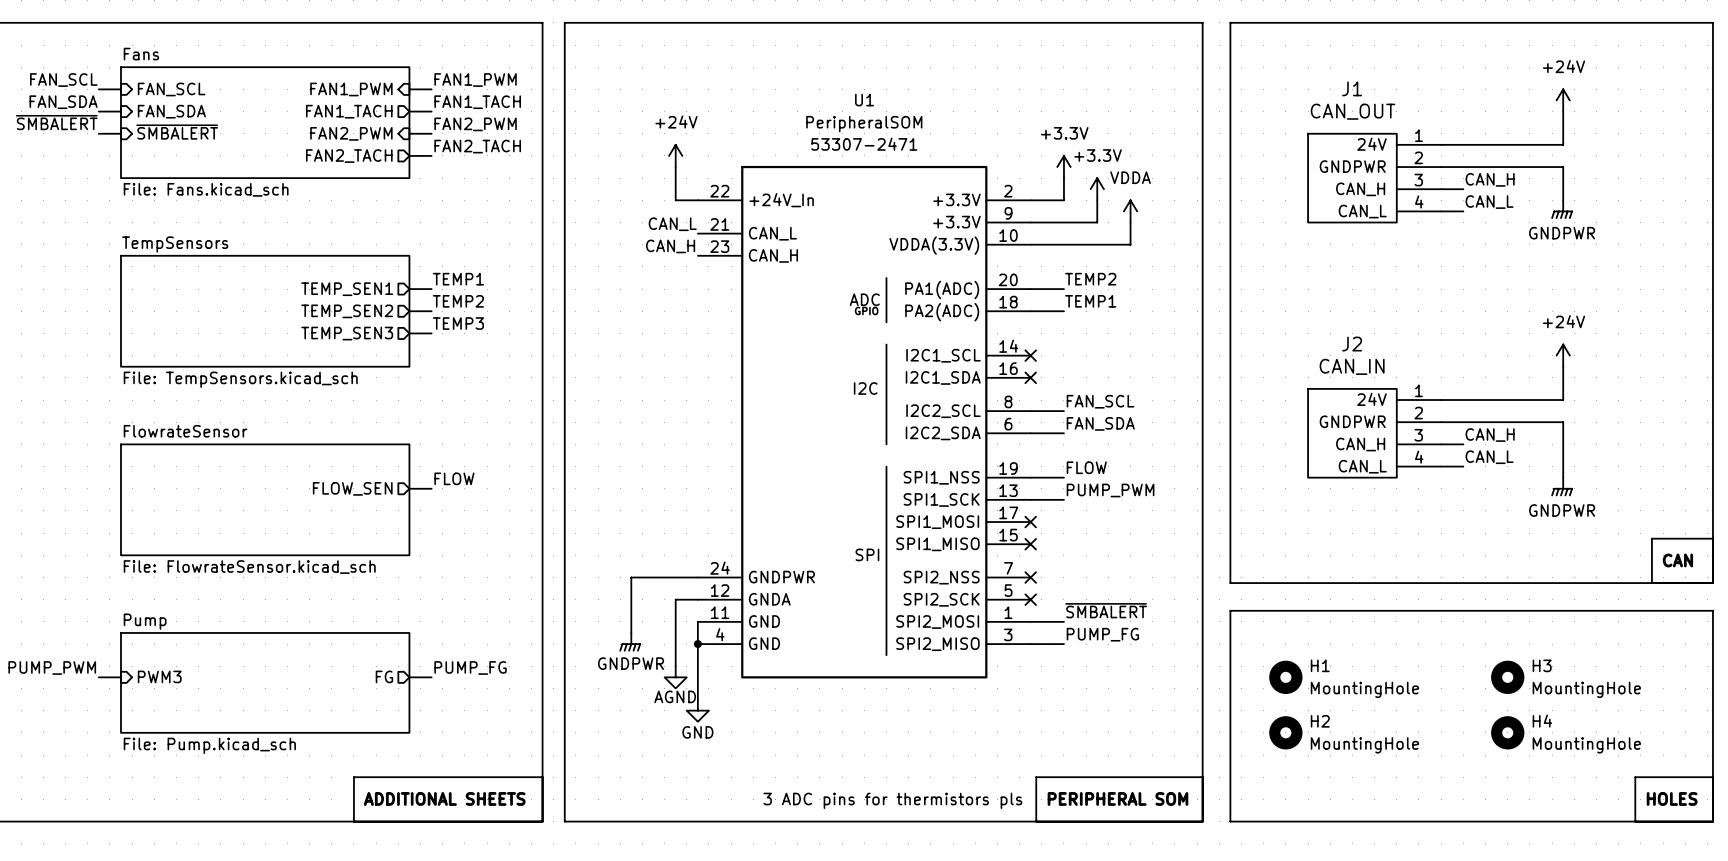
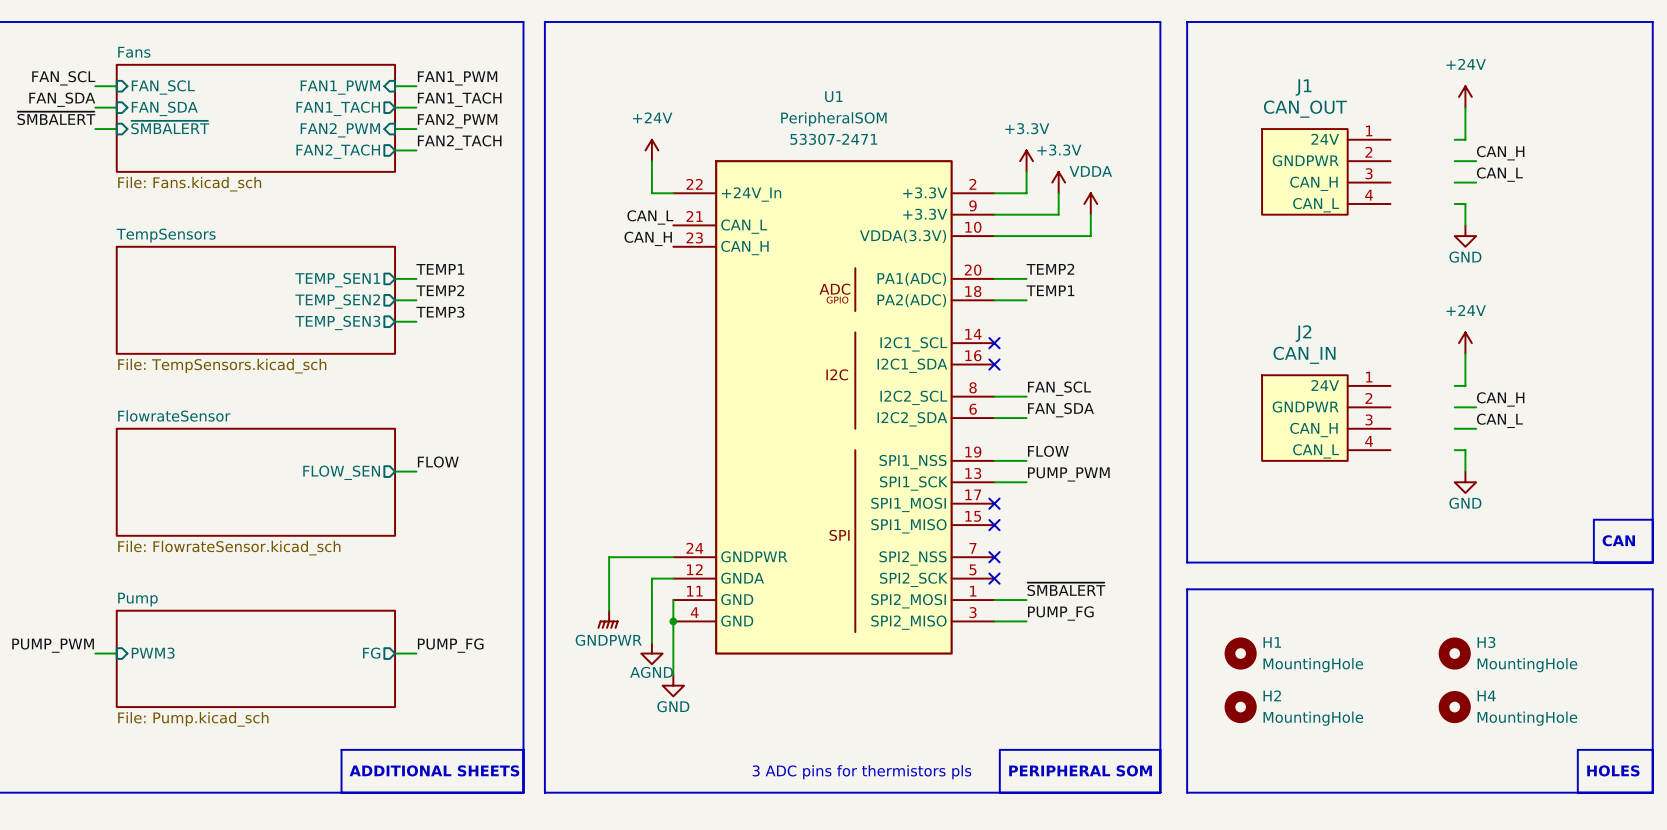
power symbol position: +24V (1563, 100) -> +24V (1465, 96)
wire: (1563, 111) (1563, 144) (1518, 144) -> (1465, 107) (1465, 139)
wire: (1441, 144) (1507, 144) -> none
wire: (1441, 167) (1507, 167) -> none
wire: (1529, 167) (1563, 167) (1563, 200) -> none
label position: CAN_H (1490, 179) -> CAN_H (1500, 153)
wire: (1441, 189) (1463, 189) -> (1454, 182) (1476, 182)
label position: CAN_L (1489, 202) -> CAN_L (1499, 174)
power symbol: GNDPWR (1562, 209) -> none
wire: (1441, 211) (1463, 211) -> none
wire: none -> (1454, 203) (1465, 203) (1465, 225)
power symbol: none -> GND (1465, 236)
power symbol position: +24V (1563, 355) -> +24V (1465, 343)
wire: (1563, 366) (1563, 400) (1518, 400) -> (1465, 353) (1465, 385)
wire: (1441, 400) (1507, 400) -> none
wire: (1441, 422) (1507, 422) -> none
wire: (1529, 422) (1563, 422) (1563, 477) -> none
label position: CAN_H (1490, 435) -> CAN_H (1500, 399)
wire: (1441, 444) (1463, 444) -> (1454, 428) (1476, 428)
label position: CAN_L (1489, 457) -> CAN_L (1499, 420)
wire: (1441, 466) (1463, 466) -> none
wire: none -> (1454, 450) (1465, 450) (1465, 471)
power symbol: GNDPWR (1562, 486) -> none
power symbol: none -> GND (1465, 482)

